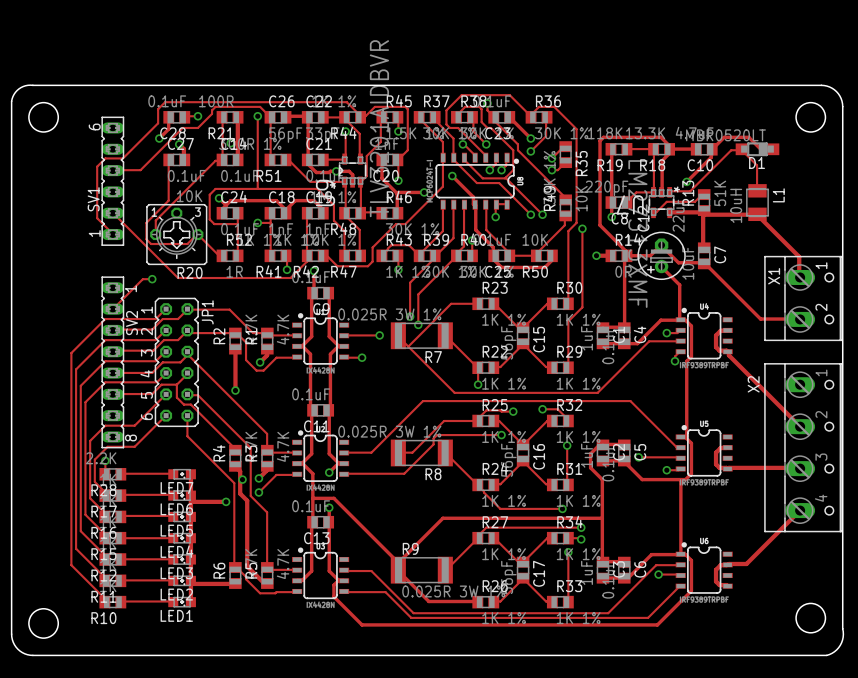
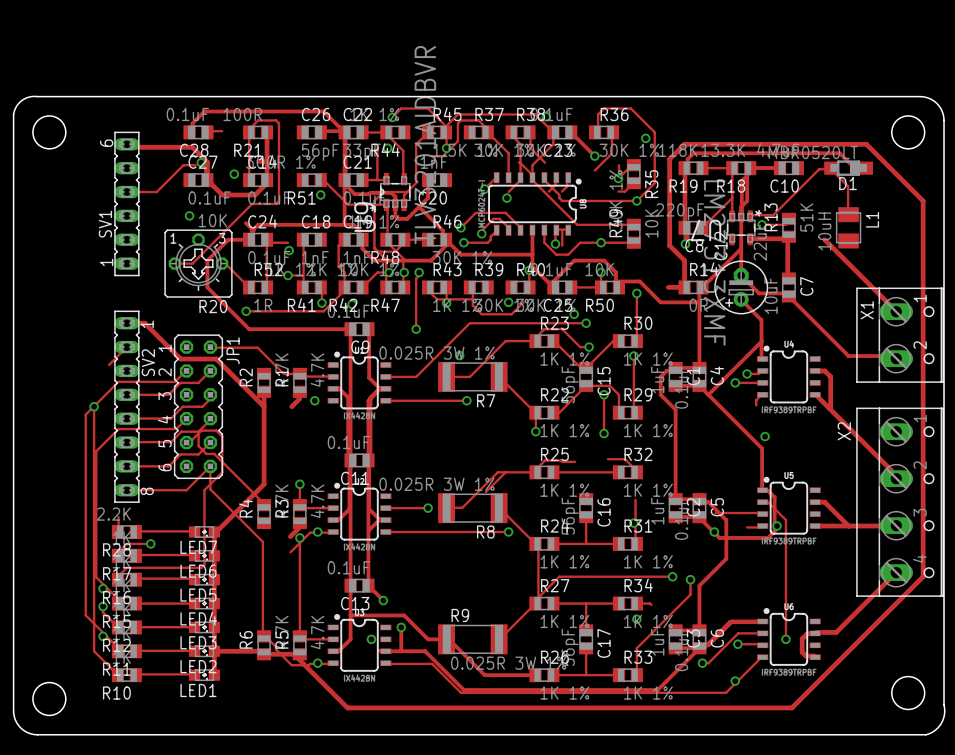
track: (487, 103) (487, 110) (494, 117) (494, 120) (517, 144) (517, 150) (565, 199) -> (392, 117) (401, 108) (428, 108) (445, 126) (457, 114) (535, 114) (553, 132) (553, 144) (532, 165) (532, 180) (577, 224) (633, 224)
via: none -> (392, 117)
via: (197, 116) -> none
track: (257, 116) (257, 188) -> none
via: (257, 116) -> none
track: (168, 117) (168, 129) (159, 138) -> (189, 132) (192, 132) (192, 123) (204, 111) (323, 111) (344, 132) (344, 224)
track: (222, 117) (222, 159) (215, 160) (155, 220) (155, 234) -> (249, 180) (249, 132) (252, 132) (252, 126) (258, 120) (276, 120) (278, 123) (278, 200) (276, 203) (252, 203) (192, 263) (174, 263)
track: (238, 117) (238, 159) -> (267, 132) (267, 180) (264, 180) (264, 186) (255, 195) (222, 195) (207, 180) (207, 162) (192, 147) (129, 147) (126, 144)
track: (381, 117) (380, 142) (366, 156) (366, 176) (360, 182) (360, 212) (381, 213) -> (428, 132) (416, 144) (416, 183) (404, 195) (404, 204)
track: (419, 117) (442, 142) (442, 186) (405, 224) (396, 224) (372, 247) (372, 261) (367, 266) (337, 266) (328, 256) (323, 255) -> (389, 272) (377, 272) (362, 287)
track: (435, 117) (435, 120) (453, 138) (454, 160) (476, 183) (499, 183) (530, 214) -> none
track: (456, 117) (465, 106) (479, 106) (481, 109) (481, 122) (487, 127) (491, 127) (513, 150) (513, 170) (505, 178) (482, 178) (464, 157) -> (511, 132) (514, 132) (514, 138) (520, 144) (520, 180) (508, 192)
via: none -> (645, 138)
track: none -> (377, 147) (377, 180)
track: (345, 131) (345, 158) (323, 159) -> (386, 179) (362, 180)
via: (159, 138) -> none
track: none -> (431, 156) (443, 156) (457, 141) (457, 123) (460, 120) (478, 120) (484, 126) (484, 132) (487, 132) (508, 153) (508, 177)
via: (230, 143) -> none
via: (462, 144) -> none
via: (486, 144) -> none
track: none -> (618, 165) (618, 171)
track: (626, 149) (653, 150) (653, 192) (636, 192) (626, 202) -> (702, 168) (732, 168) (732, 216)
track: (669, 149) (669, 145) (660, 137) (603, 137) (600, 140) (600, 225) (625, 251) (626, 255) (624, 258) (624, 327) (602, 327) -> none
track: (773, 149) (760, 149) (748, 137) (724, 137) (711, 150) (711, 157) (686, 181) -> (866, 168) (854, 168) (839, 153) (693, 153) (687, 159) (687, 168) (684, 168) (684, 227) (687, 227) (687, 245)
via: (530, 151) -> none
via: none -> (234, 174)
track: none -> (496, 177) (484, 189)
track: (485, 157) (458, 127) (449, 127) (446, 124) (446, 110) (461, 95) (509, 95) (531, 117) (530, 115) (539, 106) (554, 106) (576, 129) (576, 222) (568, 231) (568, 261) -> (544, 177) (562, 200) (636, 200) (654, 183) (654, 132) (630, 108) (604, 108) (598, 114) (598, 132) (595, 132)
track: (168, 159) (168, 200) (146, 222) (146, 239) (151, 244) (187, 244) (197, 234) (219, 255) (222, 255) -> (222, 263) (225, 263) (249, 287)
track: (270, 159) (270, 117) (260, 106) (215, 106) (212, 110) (212, 113) (197, 127) (182, 127) (140, 170) (112, 170) -> (195, 165) (183, 165) (156, 192) (126, 192)
track: (381, 159) (381, 178) (397, 193) -> (428, 180) (428, 197) (407, 218) (398, 218) (395, 215) (395, 204)
via: none -> (484, 189)
via: (489, 170) -> none
via: (501, 170) -> none
via position: (551, 170) -> (636, 200)
via: (336, 171) -> none
via: none -> (320, 195)
track: none -> (732, 197) (702, 227)
track: (452, 176) (473, 197) (473, 204) (475, 205) (475, 229) (493, 247) (494, 260) (501, 267) (544, 267) (551, 260) (552, 255) -> none
track: (505, 177) (542, 214) -> none
track: (398, 180) (397, 159) (407, 150) (407, 109) (405, 106) (374, 106) (365, 116) (360, 116) (346, 102) (165, 102) (158, 109) (158, 123) (122, 158) (105, 158) (97, 166) (97, 218) (112, 234) -> none
via: (398, 180) -> none
via position: (686, 181) -> (762, 224)
track: none -> (419, 206) (443, 230) (443, 239) (445, 239) (460, 254) (532, 254)
via: none -> (189, 215)
track: (424, 192) (397, 193) -> none
via: (424, 192) -> none
track: (397, 193) (397, 213) -> none
track: (704, 194) (694, 201) (666, 201) (653, 212) -> (788, 218) (785, 224) (762, 224)
via: (219, 198) -> none
via: none -> (460, 227)
track: (443, 204) (442, 231) (419, 255) (408, 245) (391, 245) (381, 255) -> (496, 230) (487, 242) (463, 242)
track: (453, 204) (453, 238) (410, 282) (410, 316) -> (508, 230) (508, 227) (499, 218) (493, 218) (481, 230) (481, 233)
track: (464, 204) (464, 246) (418, 294) (418, 324) -> (520, 230) (520, 227) (505, 212) (475, 212) (460, 227)
track: none -> (532, 230) (532, 266) (553, 287) (550, 284) (574, 260) (604, 260) (615, 272) (615, 287) (618, 287) (615, 281) (639, 281) (660, 302) (699, 302)
track: (485, 204) (486, 229) (508, 252) (509, 255) -> (544, 230) (544, 242) (556, 254) (568, 254) (580, 242) (633, 242)
track: (333, 205) (317, 188) (215, 188) (209, 194) (209, 219) (214, 224) (237, 224) -> (374, 230) (374, 200) (383, 192) (407, 192)
track: none -> (562, 230) (562, 245)
via: none -> (481, 233)
track: (704, 210) (704, 214) (757, 214) (799, 256) (800, 277) -> (824, 239) (896, 311)
track: (112, 213) (178, 278) (290, 278) (306, 261) (307, 213) -> (246, 311) (323, 311) (347, 287) (344, 287) (344, 272) (338, 266) (338, 245) (344, 239)
track: (222, 213) (222, 208) (230, 200) (276, 200) (285, 210) (285, 213) (287, 208) (295, 200) (314, 200) (322, 208) (323, 213) -> none
track: none -> (267, 239) (267, 242) (287, 242)
track: none -> (428, 239) (401, 239) (401, 245) (395, 251) (377, 251) (374, 247)
via: (530, 214) -> none
via: (542, 214) -> none
via: none -> (463, 242)
via: none -> (601, 242)
track: (565, 215) (564, 225) (534, 255) (536, 255) (509, 255) -> (601, 272) (601, 287) (571, 287)
track: none -> (741, 248) (702, 287) (699, 287) (699, 367) (675, 367) (675, 370) (666, 370) (660, 376) (660, 394) (675, 409) (675, 499) (699, 499) (699, 502) (708, 502) (726, 520) (726, 558) (699, 585) (699, 630) (675, 630)
track: (257, 222) (270, 222) -> none
track: (582, 228) (582, 307) (568, 321) (568, 367) -> (633, 356) (633, 412) (636, 412)
via: (582, 228) -> none
via: none -> (389, 272)
via: none -> (404, 272)
via: none -> (419, 272)
via: none -> (601, 272)
track: none -> (287, 275) (302, 275)
via: none -> (287, 275)
track: none -> (419, 275) (416, 278) (416, 329)
track: none -> (428, 287) (431, 287) (431, 293) (437, 299) (472, 299)
track: none -> (469, 287) (472, 287) (472, 305) (481, 314) (511, 314) (523, 302)
via: (596, 255) -> none
track: (626, 255) (650, 255) (661, 245) (678, 262) (705, 263) (760, 319) (800, 319) -> (780, 168) (747, 168) (747, 200) (741, 206) (741, 275) (759, 293) (788, 293) (788, 296) (848, 356) (896, 356) (896, 358)
via: none -> (636, 293)
via: none -> (508, 302)
track: (314, 270) (314, 292) (311, 293) (311, 336) (302, 345) -> none
via: none -> (246, 311)
track: (152, 279) (142, 279) (112, 309) -> (109, 364) (126, 347)
via: (152, 279) -> none
via: none -> (574, 314)
track: none -> (126, 323) (144, 323) (180, 359) (216, 359) (264, 406)
via: none -> (586, 323)
via: none -> (416, 329)
track: none -> (535, 341) (538, 341) (538, 335) (544, 329) (562, 329) (580, 347) (589, 347)
track: none -> (762, 341) (708, 394)
track: (166, 309) (155, 319) (105, 319) (71, 353) (71, 565) (104, 597) (104, 602) -> (94, 406) (94, 651) (117, 675)
track: (187, 309) (178, 319) (162, 319) (152, 329) (112, 330) -> none
via: none -> (589, 347)
via: none -> (633, 356)
via: (418, 324) -> none
track: (727, 330) (720, 330) (716, 335) (716, 347) (719, 350) (726, 350) (728, 355) (800, 426) -> (815, 394) (896, 475) (896, 478)
track: none -> (815, 370) (824, 370) (830, 376) (829, 408)
track: (379, 335) (344, 335) -> (586, 323) (469, 323) (416, 376) (385, 376)
via: (379, 335) -> none
track: (398, 335) (454, 392) (597, 392) (649, 341) (680, 341) -> (735, 382) (762, 382)
track: (419, 335) (408, 346) -> (469, 376) (446, 376)
via: none -> (735, 382)
track: (602, 343) (637, 343) (660, 320) (685, 320) (691, 326) (691, 356) (686, 361) (685, 437) -> (675, 385) (699, 385) (762, 448) (762, 490)
track: none -> (380, 388) (368, 400) (368, 585) (383, 600)
track: (235, 349) (235, 390) -> (264, 391) (264, 484) (216, 531)
track: (112, 351) (153, 350) (163, 340) (178, 340) (187, 330) (186, 333) (237, 334) (246, 342) (246, 360) (256, 370) (263, 370) (276, 357) (297, 357) -> (126, 394) (168, 394) (180, 382) (198, 382) (210, 370)
track: (166, 351) (155, 361) (105, 361) (80, 385) (80, 531) (104, 554) (104, 559) -> (103, 606) (103, 612) (117, 627)
track: none -> (604, 394) (604, 433)
via: none -> (604, 394)
track: (187, 354) (267, 433) (267, 450) (269, 452) (297, 452) -> (299, 484) (299, 508) (333, 508)
track: (344, 357) (362, 357) -> (385, 400) (466, 400)
via: (362, 357) -> none
via: none -> (466, 400)
via: (675, 361) -> none
via: none -> (94, 406)
via position: (260, 362) -> (314, 400)
track: (493, 367) (500, 367) (523, 343) (546, 367) (552, 367) -> (553, 412) (559, 412) (586, 385) (610, 385) (618, 394) (618, 412)
via: none -> (604, 433)
via: none -> (765, 436)
via: (235, 390) -> none
track: (166, 394) (134, 425) (105, 425) (90, 440) (90, 498) (104, 512) (104, 516) -> (186, 442) (189, 442) (201, 430) (216, 430) (222, 436) (222, 472) (204, 490) (204, 564) (201, 567) (126, 567) (120, 573) (120, 579) (117, 579)
track: (187, 394) (197, 395) (250, 447) (250, 496) (267, 512) (267, 567) (269, 569) (297, 570) -> (299, 537) (299, 639) (333, 639)
track: none -> (210, 442) (198, 454) (180, 454) (168, 466) (126, 466)
via: (542, 409) -> none
via: (513, 411) -> none
track: (166, 415) (134, 446) (107, 446) (94, 459) (94, 481) (104, 491) (104, 495) -> (150, 543) (126, 543) (120, 549) (120, 555) (117, 555)
track: none -> (210, 466) (186, 490) (126, 490)
track: (499, 421) (523, 444) (547, 421) -> (559, 472) (613, 472)
via: none -> (299, 484)
track: (437, 435) (501, 435) -> (489, 488) (505, 472)
via: (501, 435) -> none
track: (433, 438) (433, 444) (404, 473) (344, 474) -> (508, 531) (385, 531)
track: (624, 444) (598, 445) (590, 453) (590, 467) (602, 479) (602, 560) (602, 562) (624, 562) -> none
via position: (567, 445) -> (633, 523)
track: (680, 447) (676, 446) (630, 401) (423, 401) (371, 452) (344, 452) -> (428, 508) (385, 508)
track: none -> (762, 502) (768, 502) (785, 520) (785, 639)
track: (727, 447) (720, 447) (716, 452) (716, 464) (719, 467) (800, 468) -> (815, 526) (896, 525)
track: none -> (815, 502) (824, 502) (848, 526)
via: none -> (428, 508)
track: (445, 452) (500, 508) (562, 508) -> (499, 508) (535, 543) (538, 543) (538, 603) (535, 603)
via: (638, 457) -> none
via: (105, 460) -> none
track: none -> (586, 517) (586, 543)
track: (302, 463) (312, 473) (311, 571) (302, 580) (297, 580) -> (445, 239) (448, 242) (431, 260) (374, 260) (362, 248) (359, 230) (353, 224) (258, 224) (252, 230) (252, 239) (228, 239) (207, 260) (207, 287) (249, 329) (350, 329) (350, 639) (338, 651) (333, 651)
track: (235, 466) (240, 471) (240, 493) (247, 500) (247, 566) (263, 582) (267, 583) -> none
via: none -> (777, 526)
via: (666, 470) -> none
via: (329, 472) -> none
via: none -> (317, 531)
via: none -> (508, 531)
via: none -> (714, 531)
via: (258, 478) -> none
via: (242, 479) -> none
via: none -> (299, 537)
track: (680, 479) (680, 554) (685, 554) (691, 560) (691, 590) (657, 624) (362, 624) (333, 596) (333, 585) (338, 580) (329, 571) (329, 507) -> none
via: none -> (150, 543)
track: (493, 484) (500, 484) (523, 460) (546, 484) (552, 484) -> (553, 543) (618, 543)
via: (258, 492) -> none
track: (312, 498) (333, 498) (398, 562) (398, 570) -> none
track: (190, 501) (226, 501) -> none
via: (226, 501) -> none
via: (329, 507) -> none
via: (562, 508) -> none
via: none -> (672, 576)
via: none -> (690, 579)
track: (602, 518) (442, 518) (399, 561) (398, 570) -> none
via: none -> (103, 588)
track: (581, 527) (486, 527) (445, 570) -> (672, 576) (559, 576) (499, 639)
via: (581, 527) -> none
via: none -> (383, 600)
track: (494, 538) (517, 561) (523, 562) (547, 538) -> (554, 603) (613, 603)
track: none -> (586, 603) (586, 630)
via: (581, 539) -> none
via: none -> (103, 606)
track: (568, 552) (568, 578) -> (690, 579) (690, 594) (636, 648)
track: none -> (762, 621) (732, 621) (708, 645) (699, 645) (699, 648) (657, 690) (463, 690) (425, 651) (385, 651)
track: none -> (401, 627) (401, 651)
via: none -> (401, 627)
track: (680, 564) (656, 565) (608, 613) (413, 613) (371, 571) (344, 570) -> (762, 633) (738, 633) (708, 663) (702, 663)
via: none -> (103, 636)
via: none -> (371, 639)
track: (398, 570) (428, 601) (477, 602) -> (350, 615) (404, 615) (428, 639) (448, 639) (484, 675) (535, 675)
via: none -> (785, 639)
track: none -> (586, 648) (586, 675)
track: (190, 580) (192, 583) (235, 583) -> (214, 651) (264, 651) (264, 654) (299, 654) (293, 654) (347, 707) (791, 707) (923, 576) (923, 200) (866, 144) (684, 144) (669, 159) (669, 245) (684, 260) (684, 287)
via: none -> (317, 663)
via: none -> (702, 663)
track: (493, 602) (500, 601) (523, 578) (546, 601) (552, 602) -> (553, 675) (618, 675)
via: none -> (735, 681)

